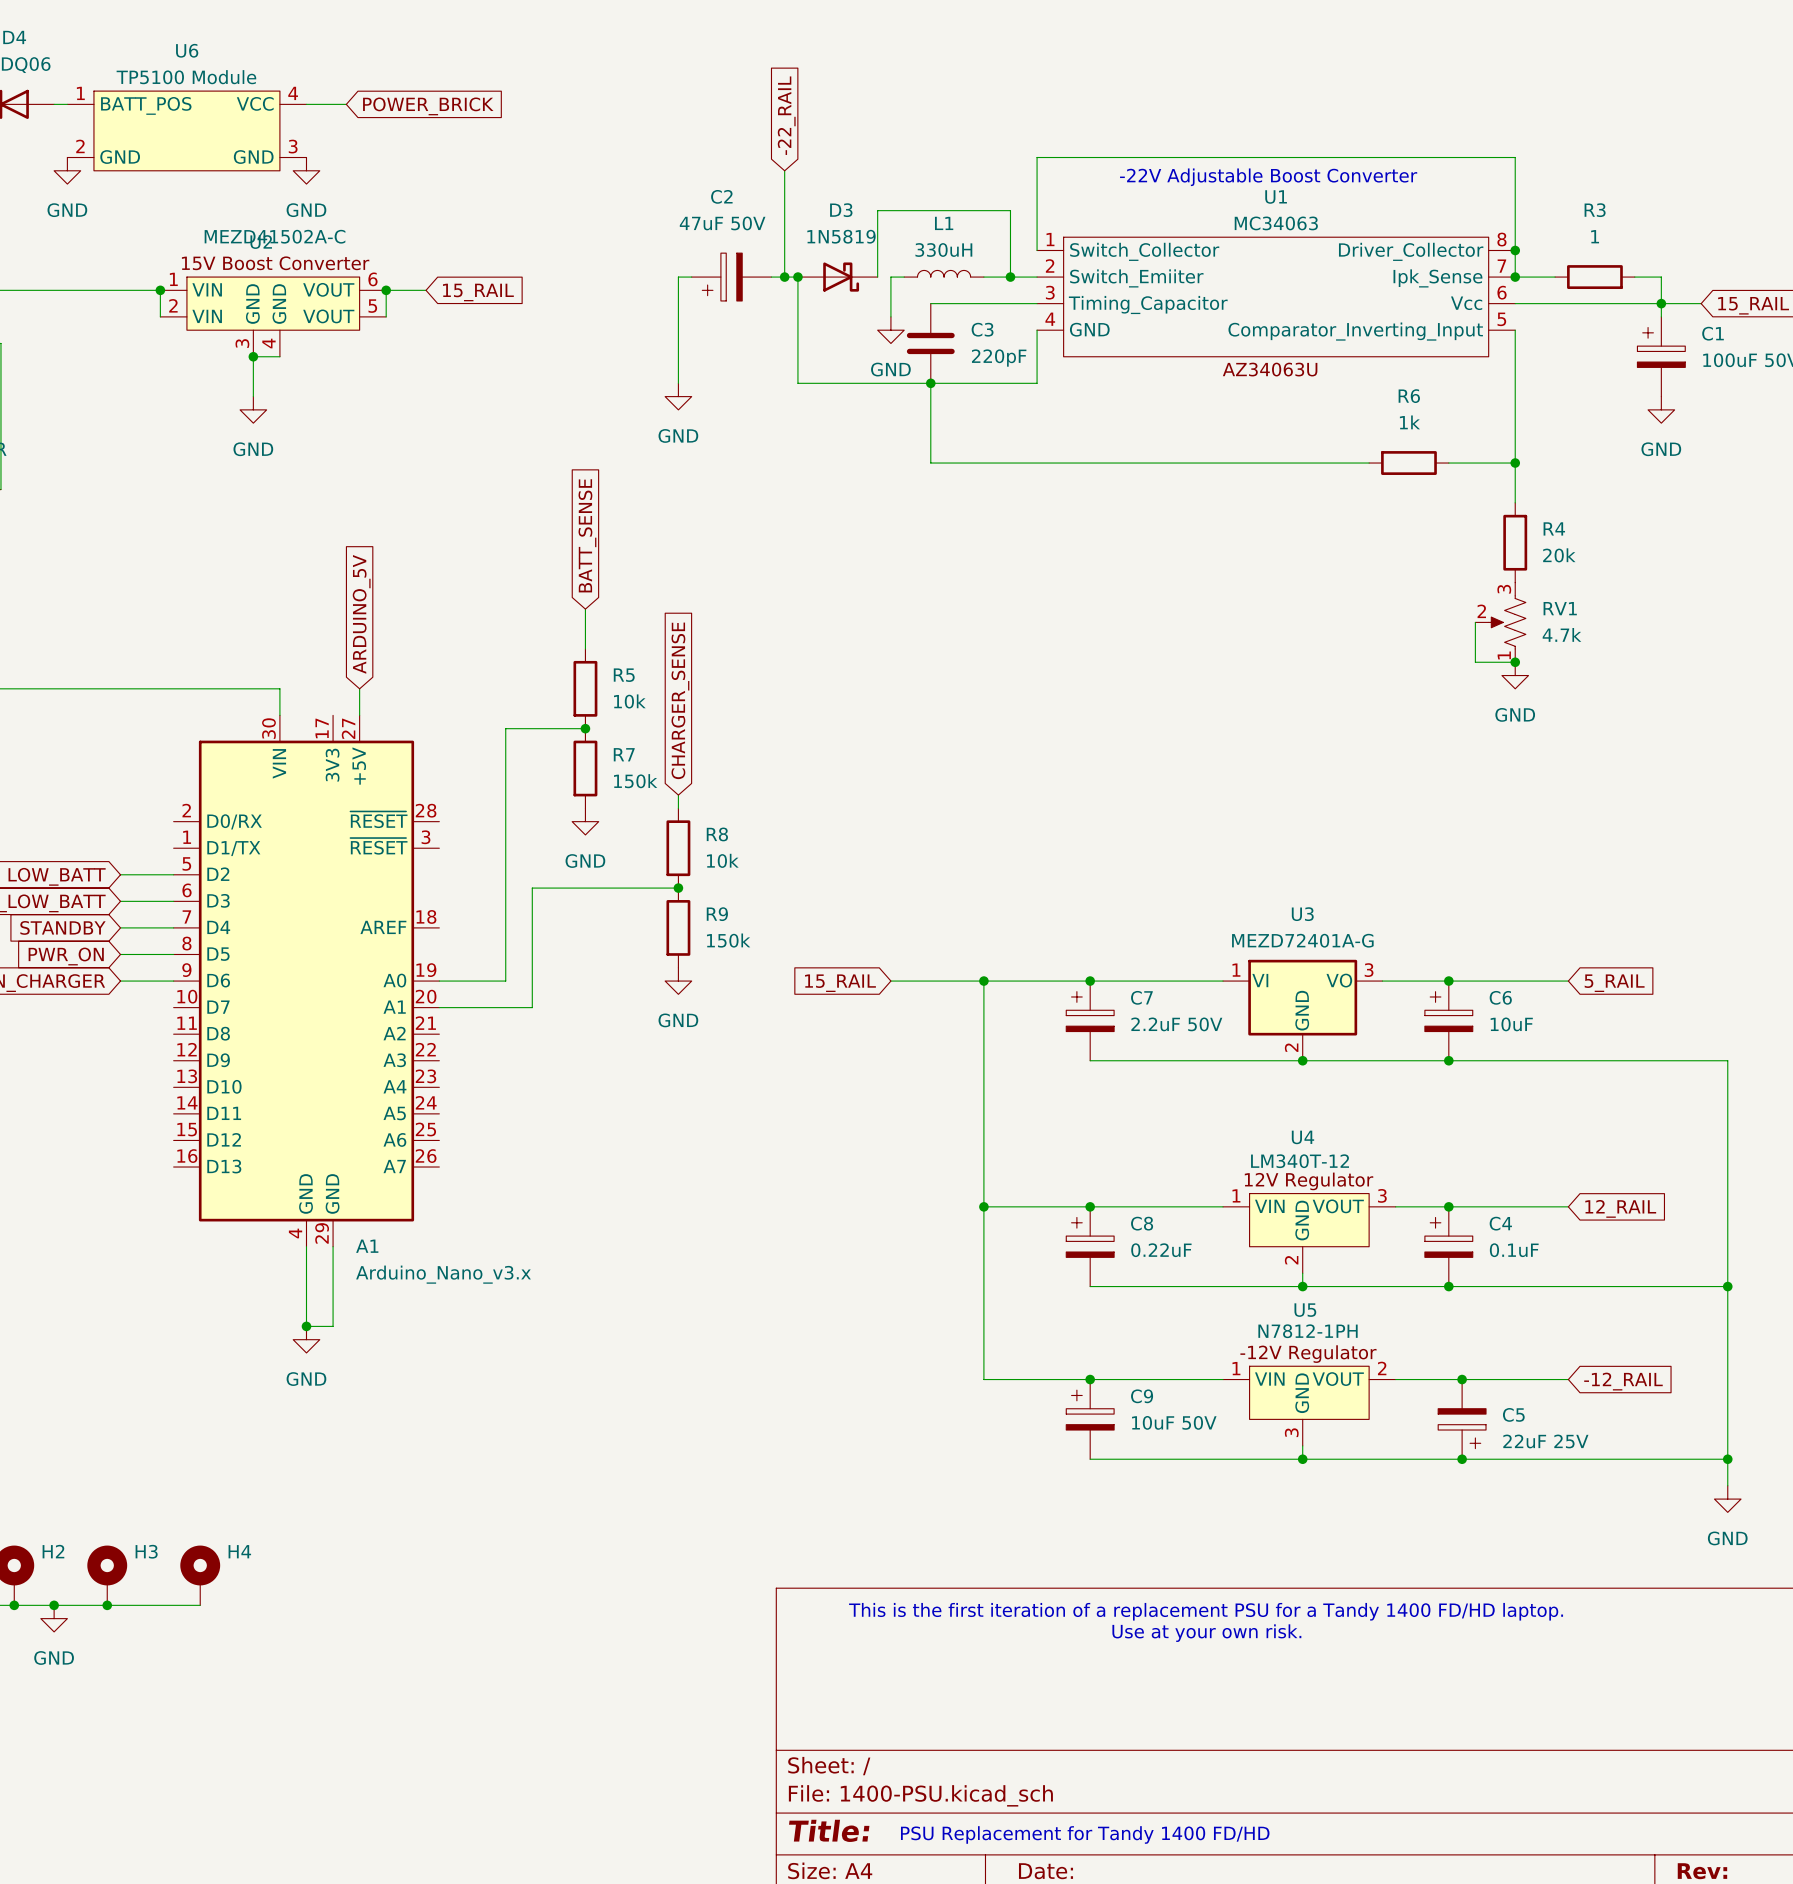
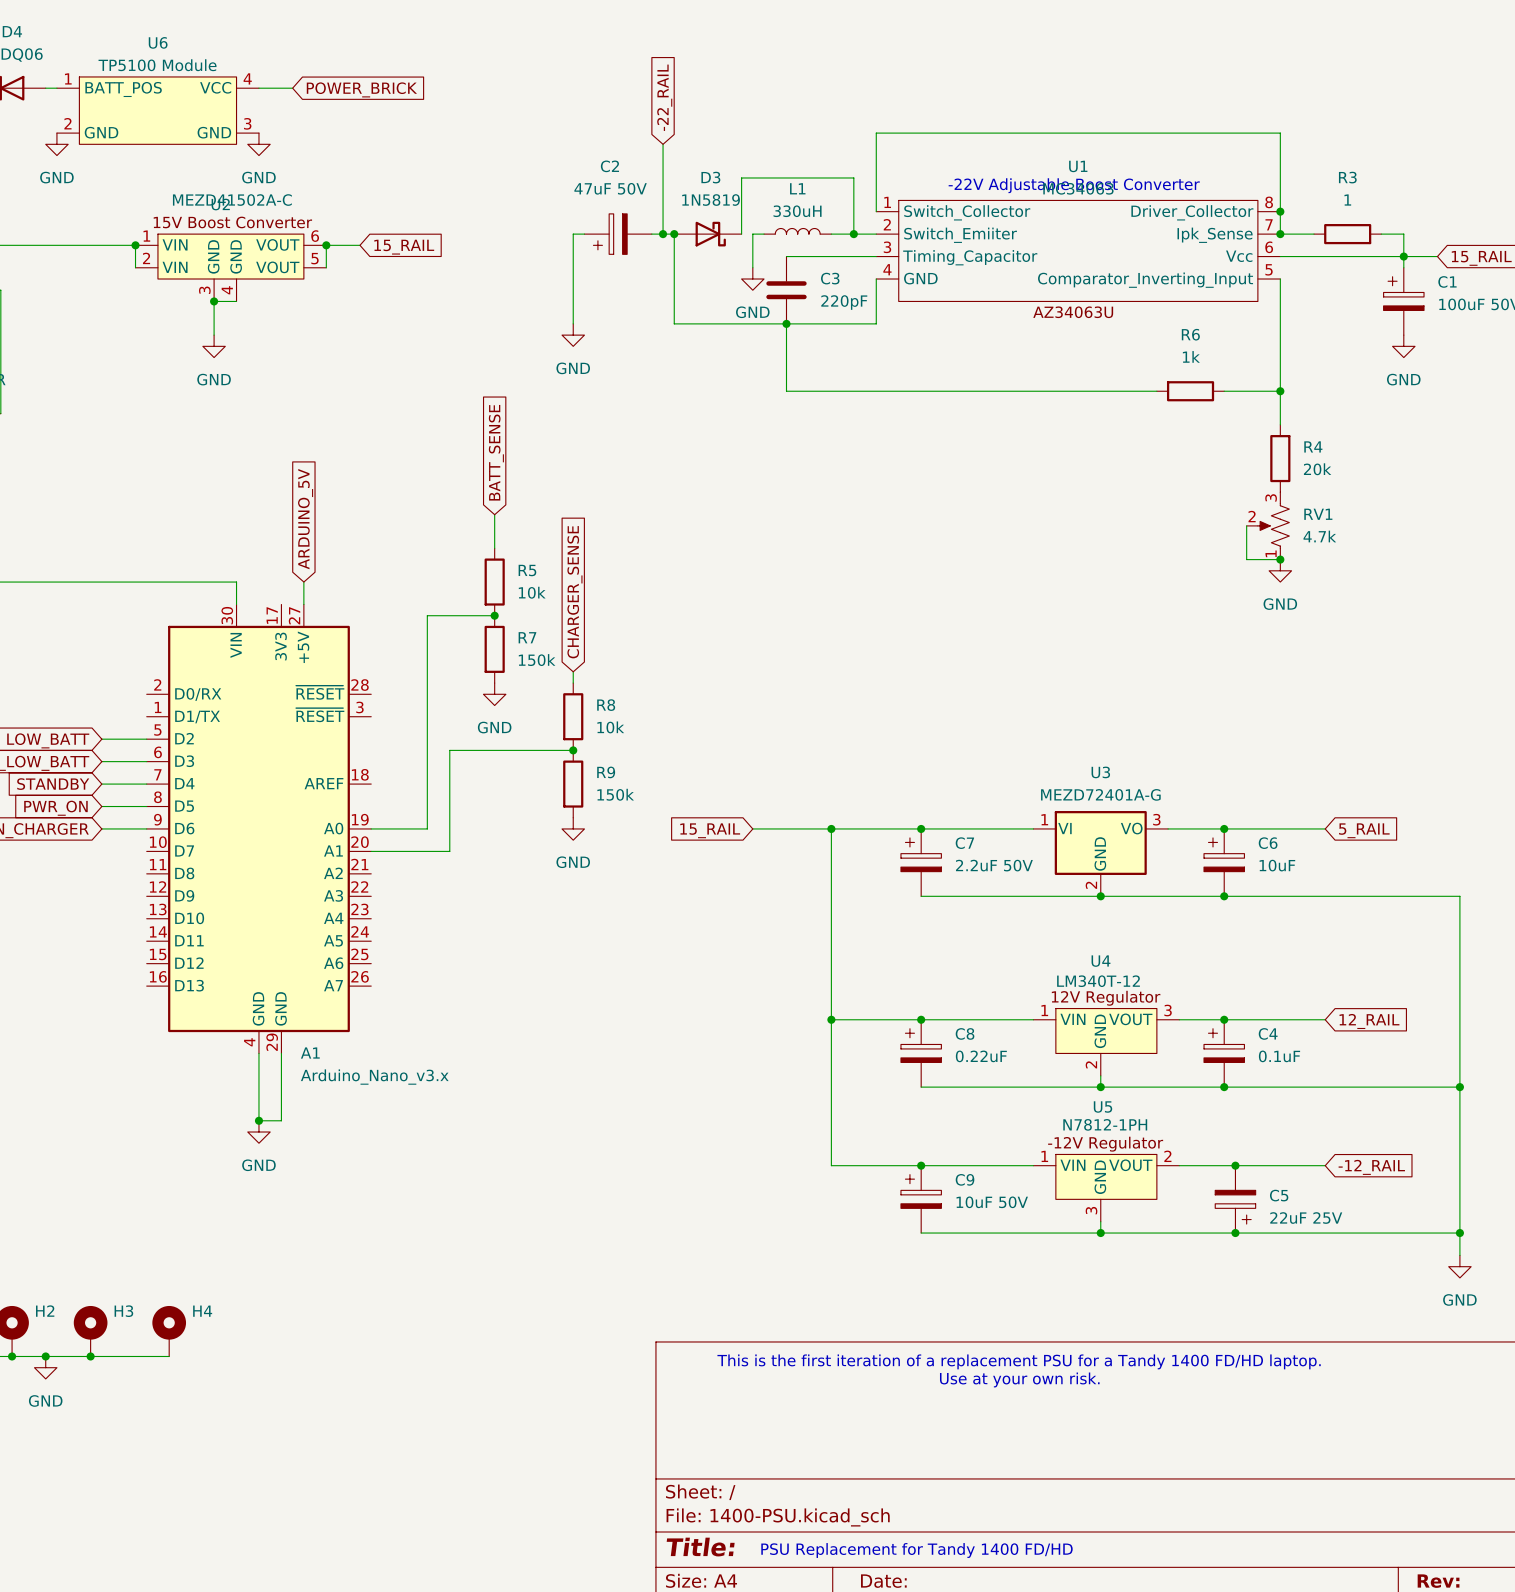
text position: -22V Adjustable Boost Converter (1268, 177) -> -22V Adjustable Boost Converter (1074, 185)

